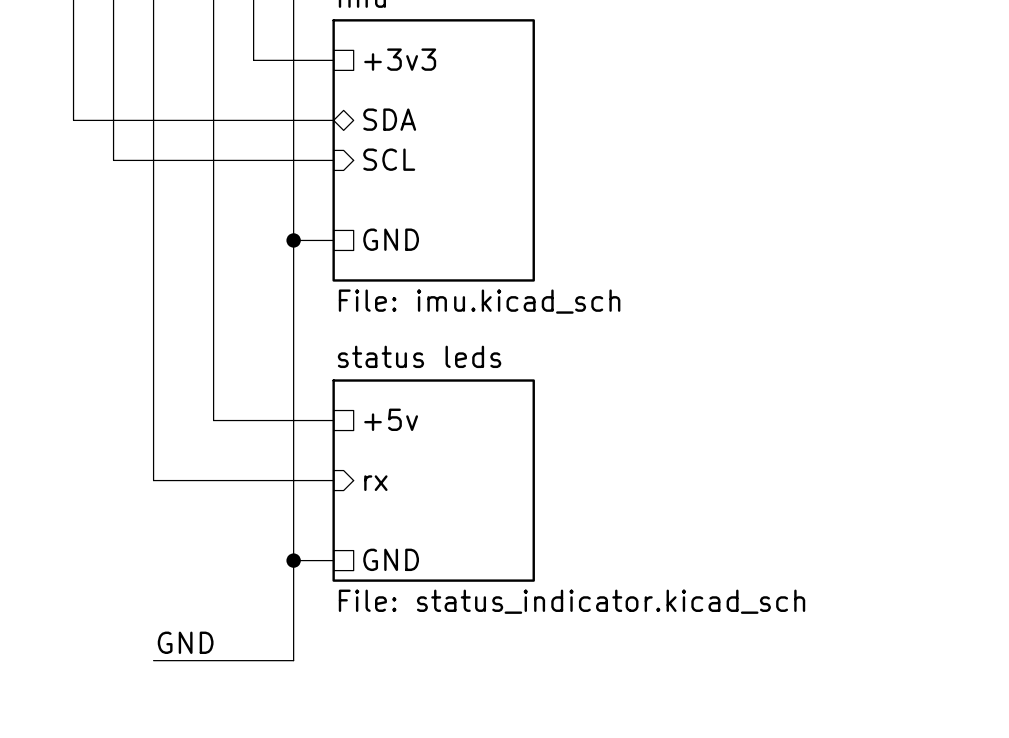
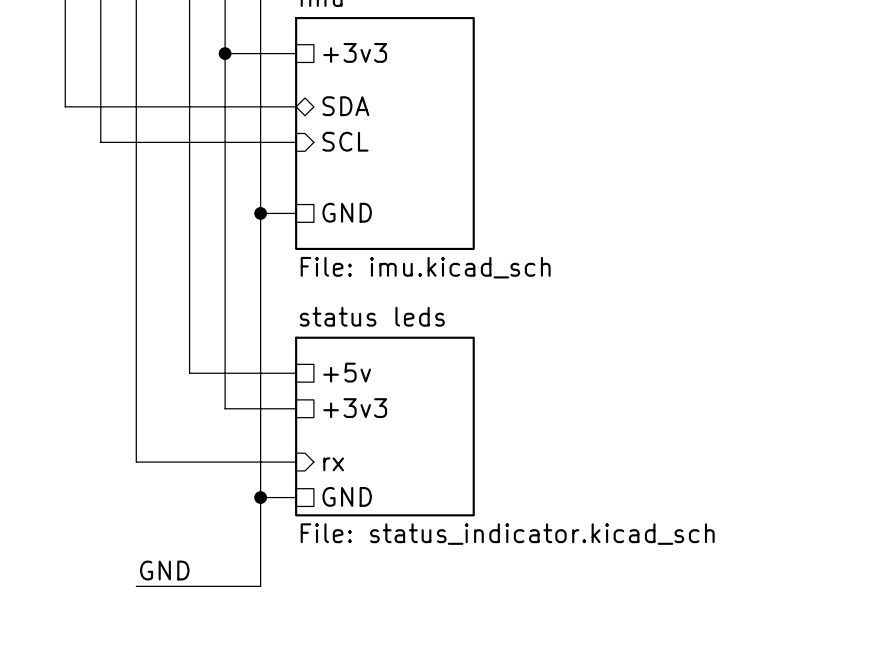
wire: none -> (225, 53) (225, 408) (296, 408)
junction: none -> (225, 53)
sheet pin: none -> +3v3 (355, 408)
wire: (153, 480) (333, 480) -> (136, 426) (136, 462) (296, 462)
sheet pin position: rx (375, 483) -> rx (333, 464)

